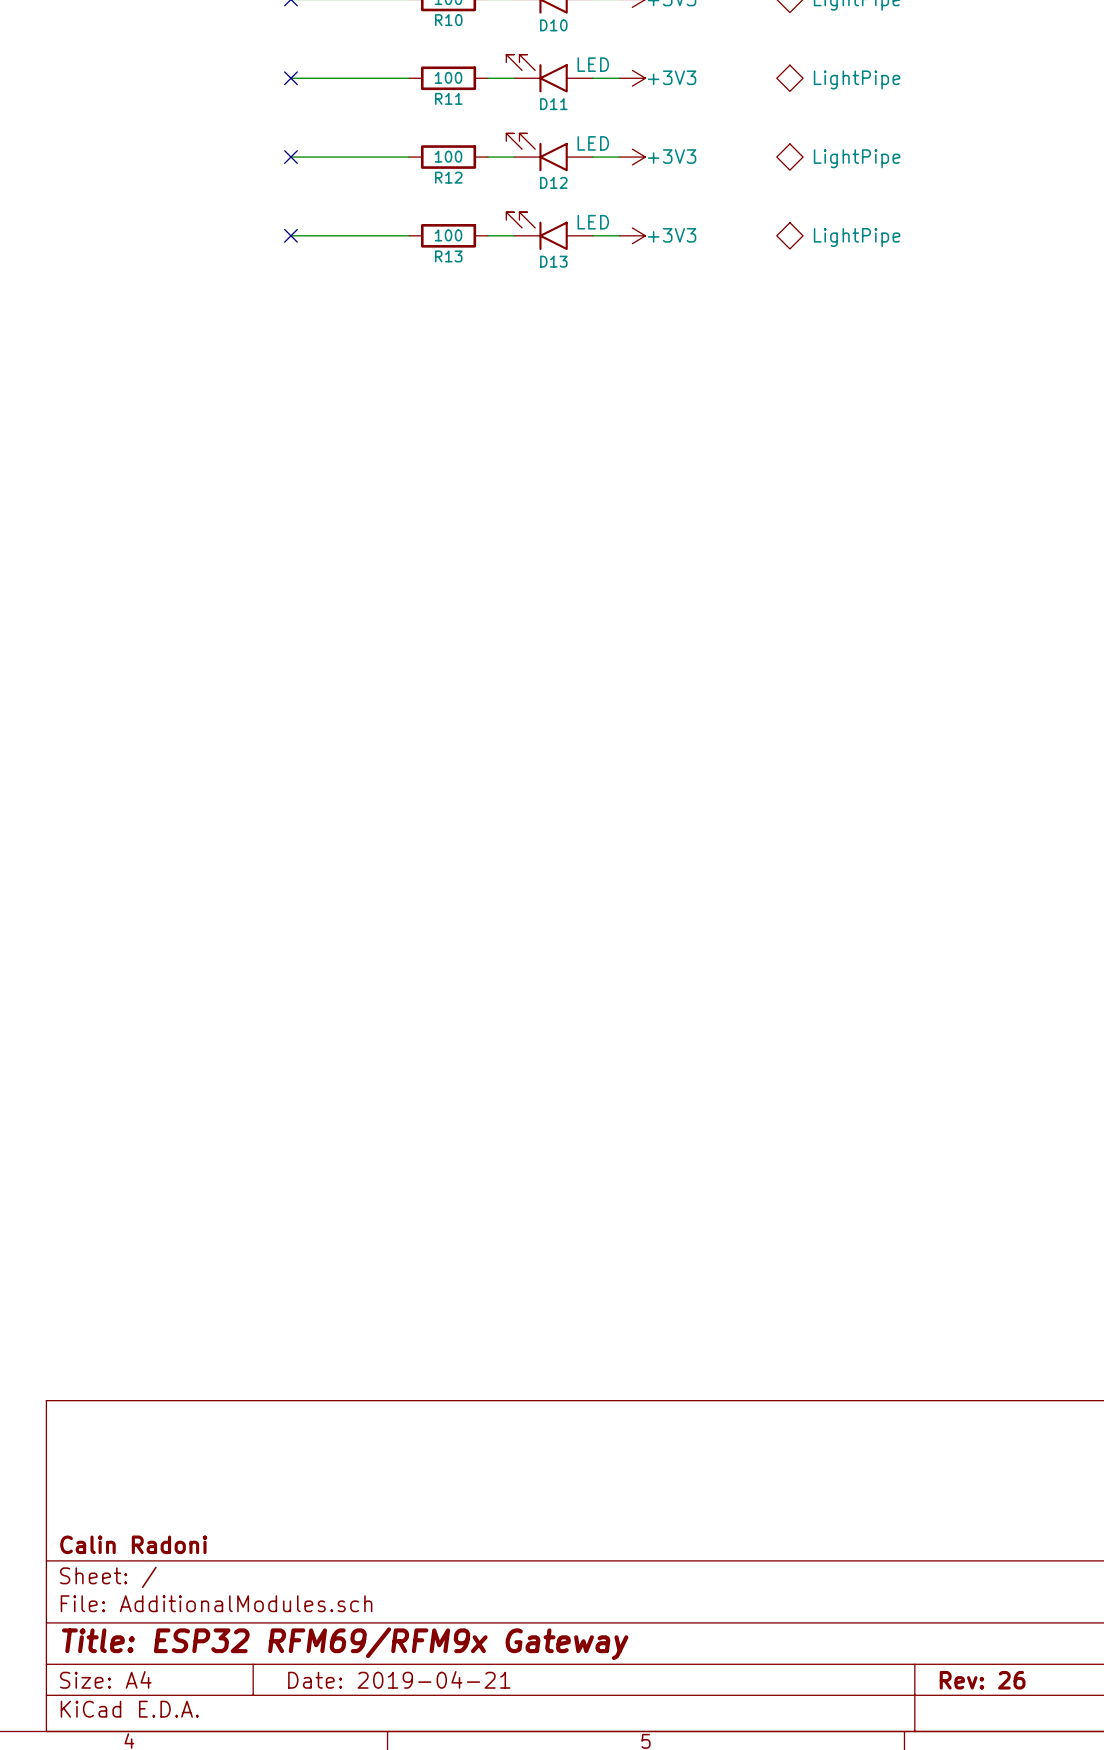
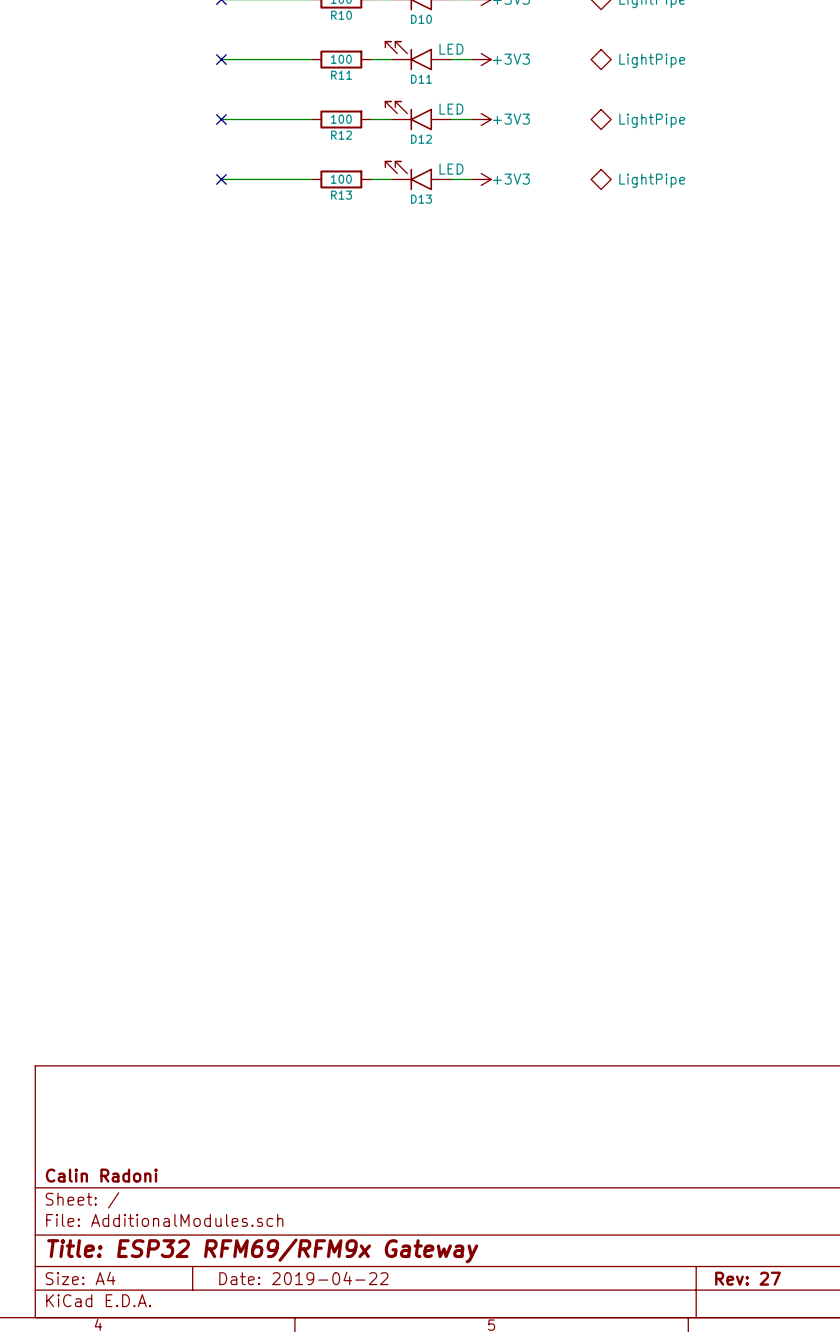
title block: Date: 2019-04-21 (399, 1679) -> Date: 2019-04-22 (303, 1278)
title block: Rev: 26 (982, 1680) -> Rev: 27 (748, 1278)

